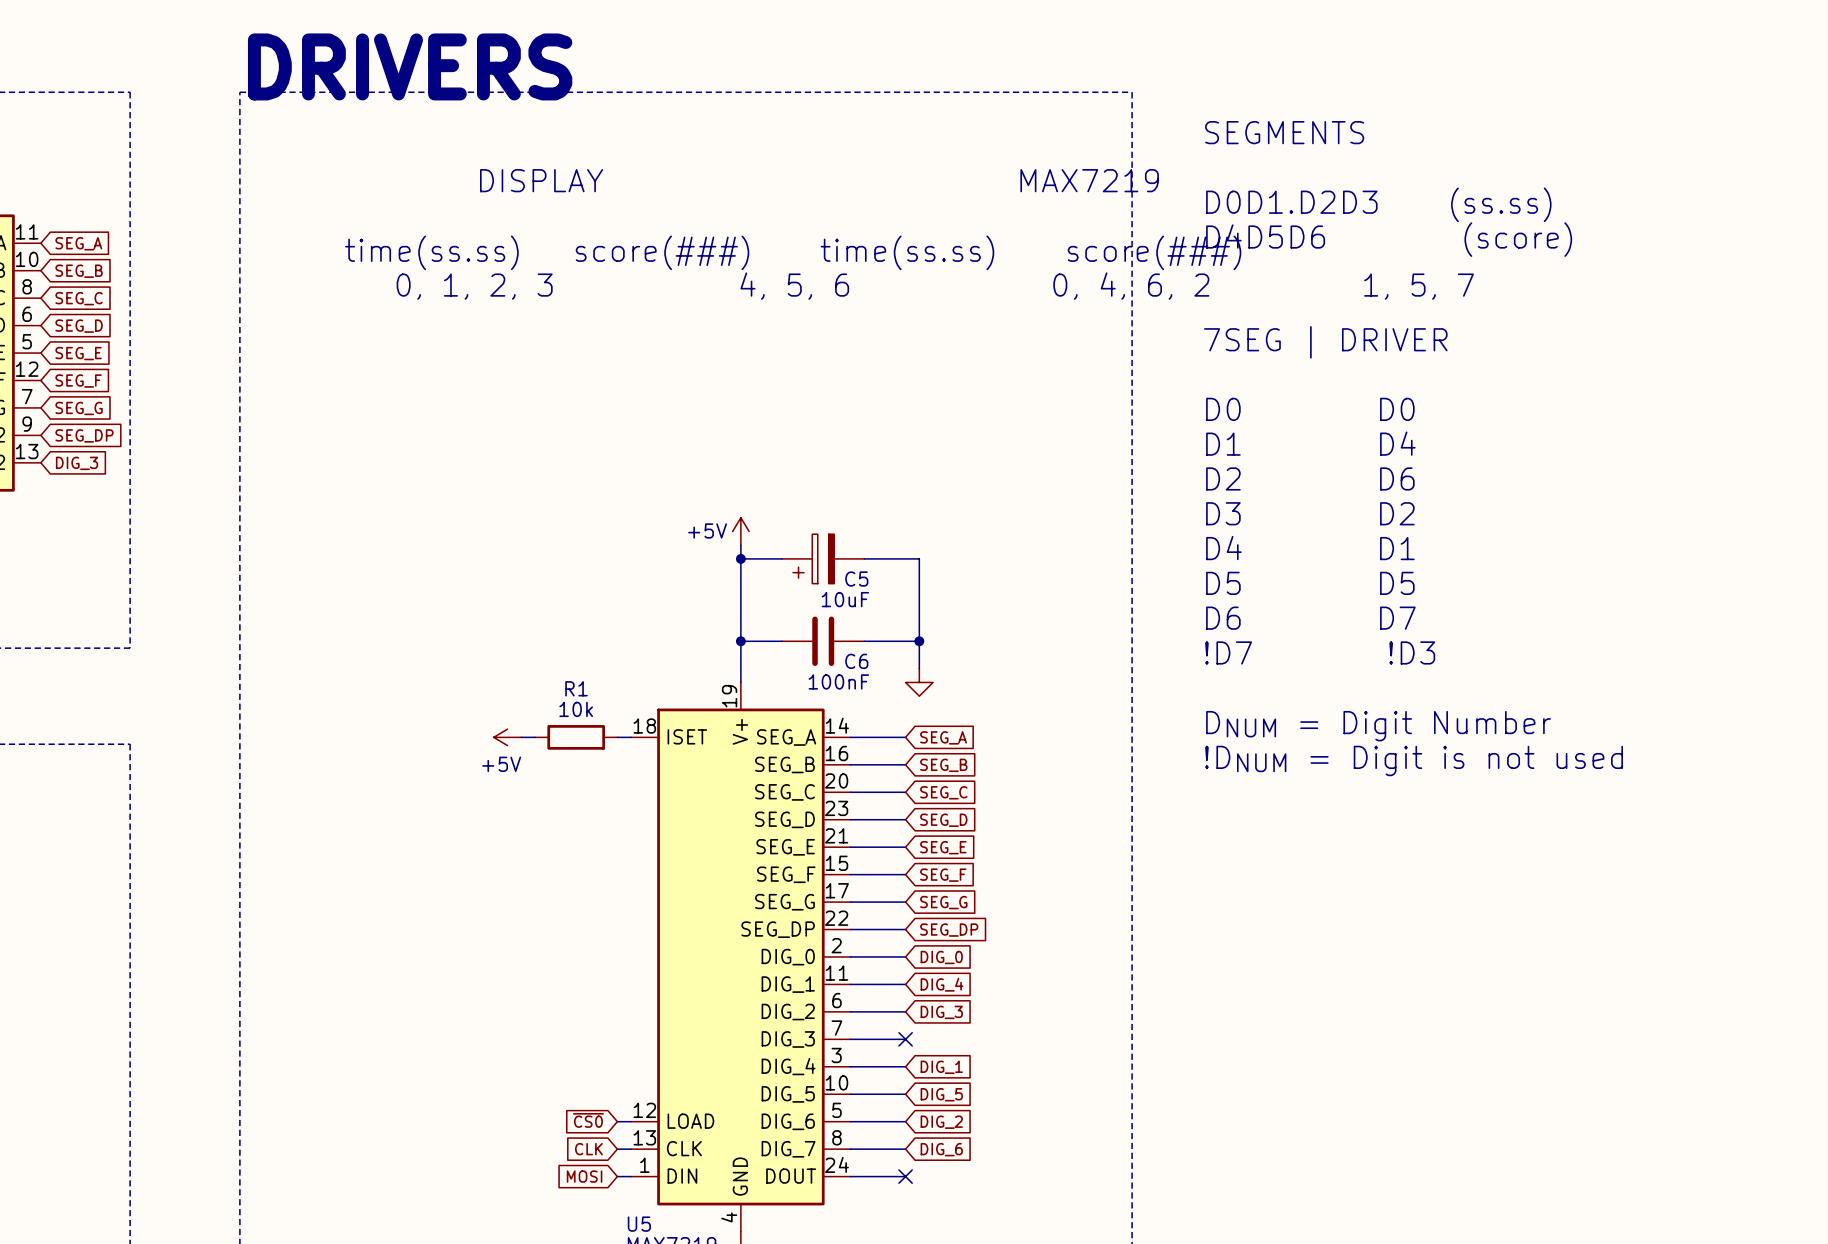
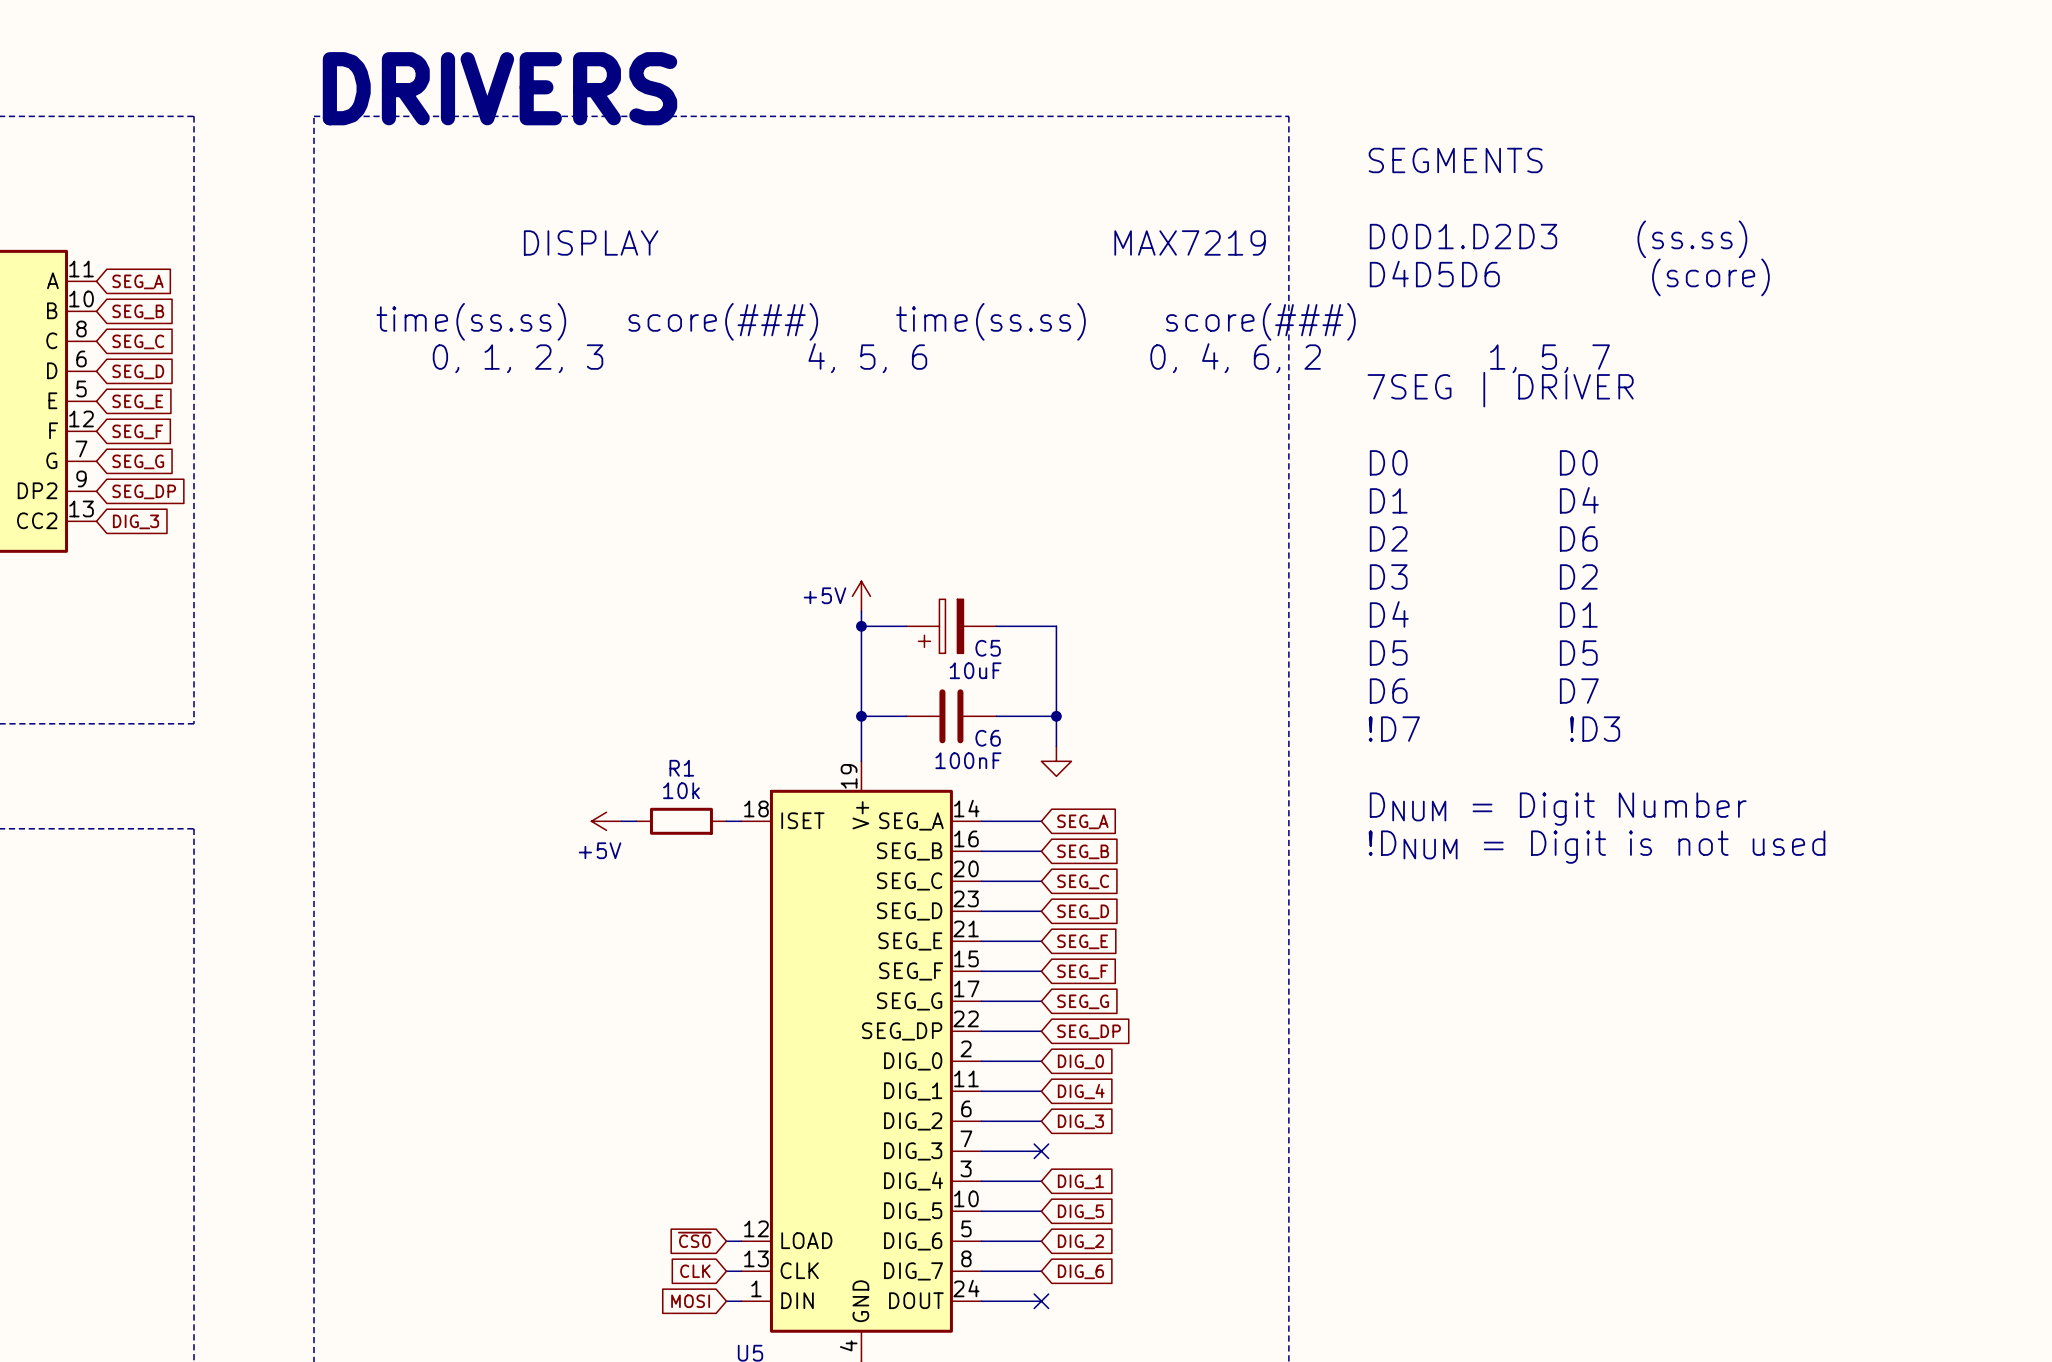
text position: DISPLAY MAX7219 (819, 180) -> DISPLAY MAX7219 (894, 242)
text position: time(ss.ss) score(###) time(ss.ss) score(###) (793, 252) -> time(ss.ss) score(###) time(ss.ss) score(###) (866, 321)
text position: 0, 1, 2, 3 4, 5, 6 0, 4, 6, 2 1, 5, 7 (935, 286) -> 0, 1, 2, 3 4, 5, 6 0, 4, 6, 2 1, 5, 7 (1021, 358)

